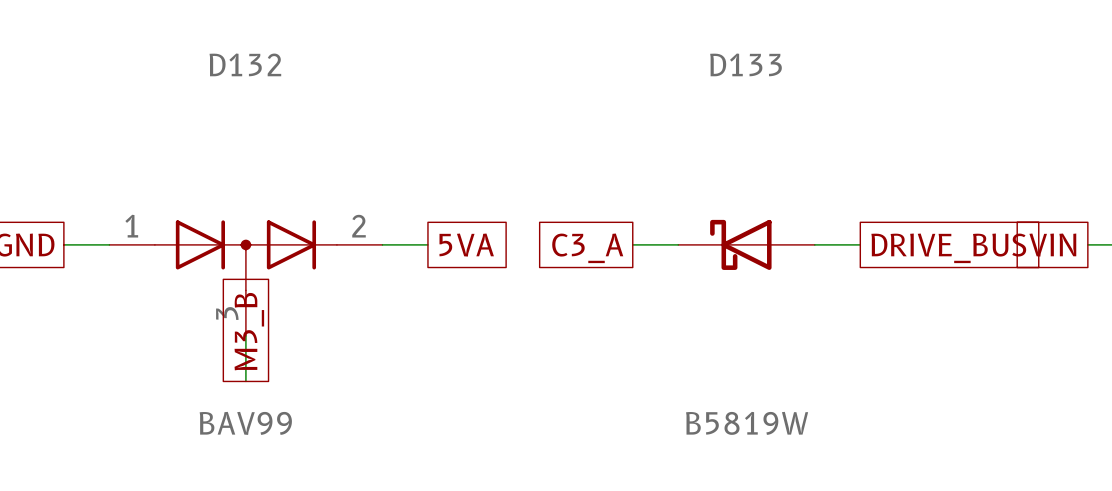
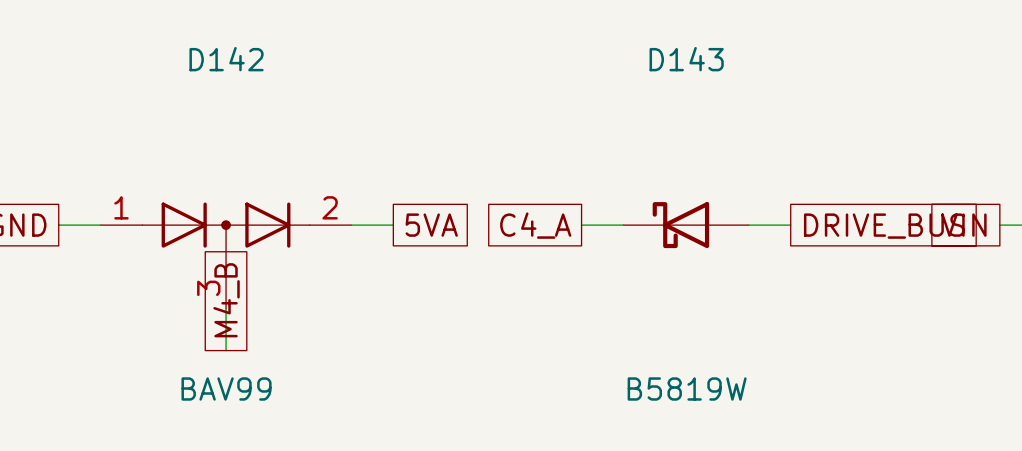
D132 name: D132 (245, 64) -> D142 (226, 59)
D133 name: D133 (746, 64) -> D143 (686, 59)
global label: C3_A (587, 248) -> C4_A (535, 225)
global label: M3_B (249, 331) -> M4_B (226, 300)

